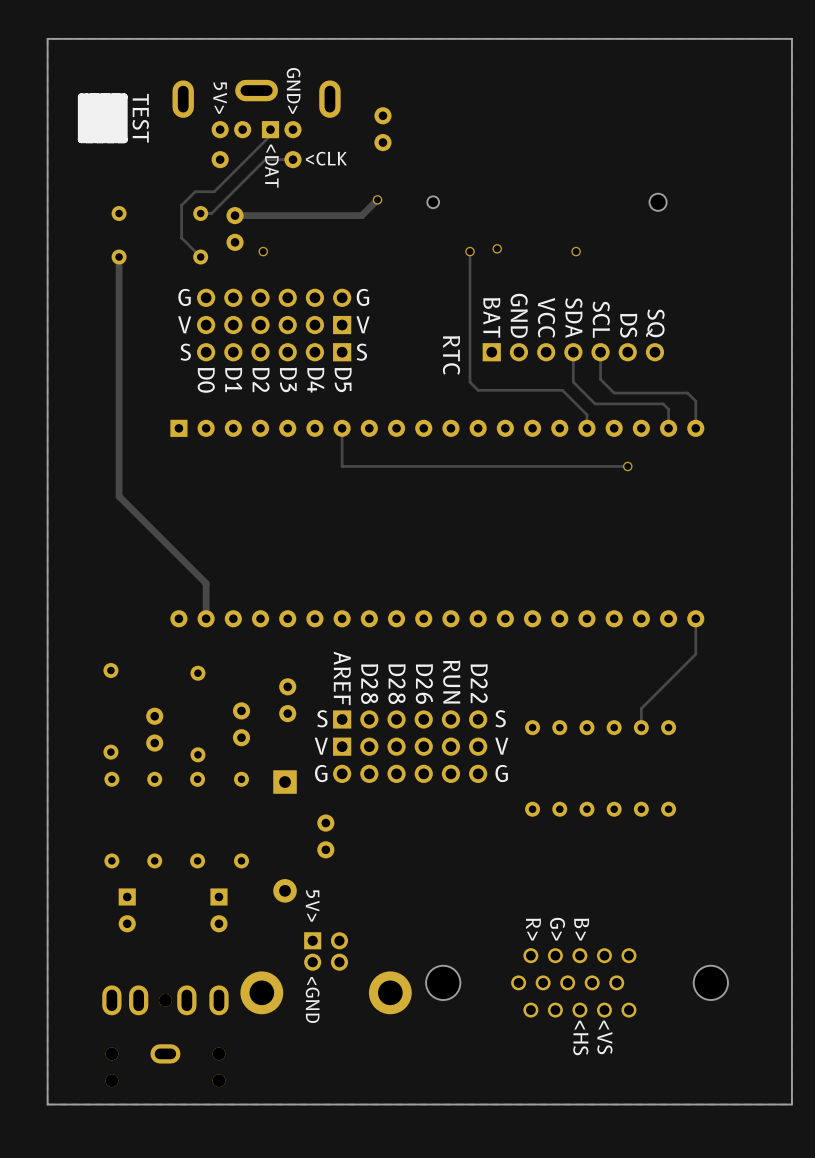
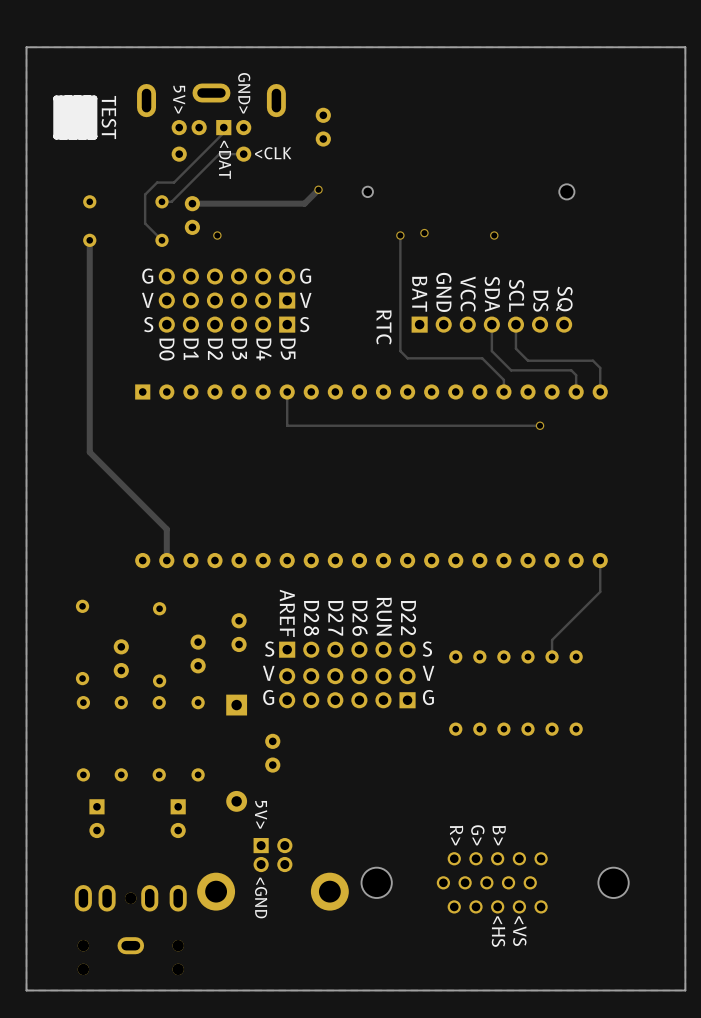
text: D28 (396, 684) -> D27 (335, 618)
part rotation: 0° (410, 760) -> 180° (347, 688)

